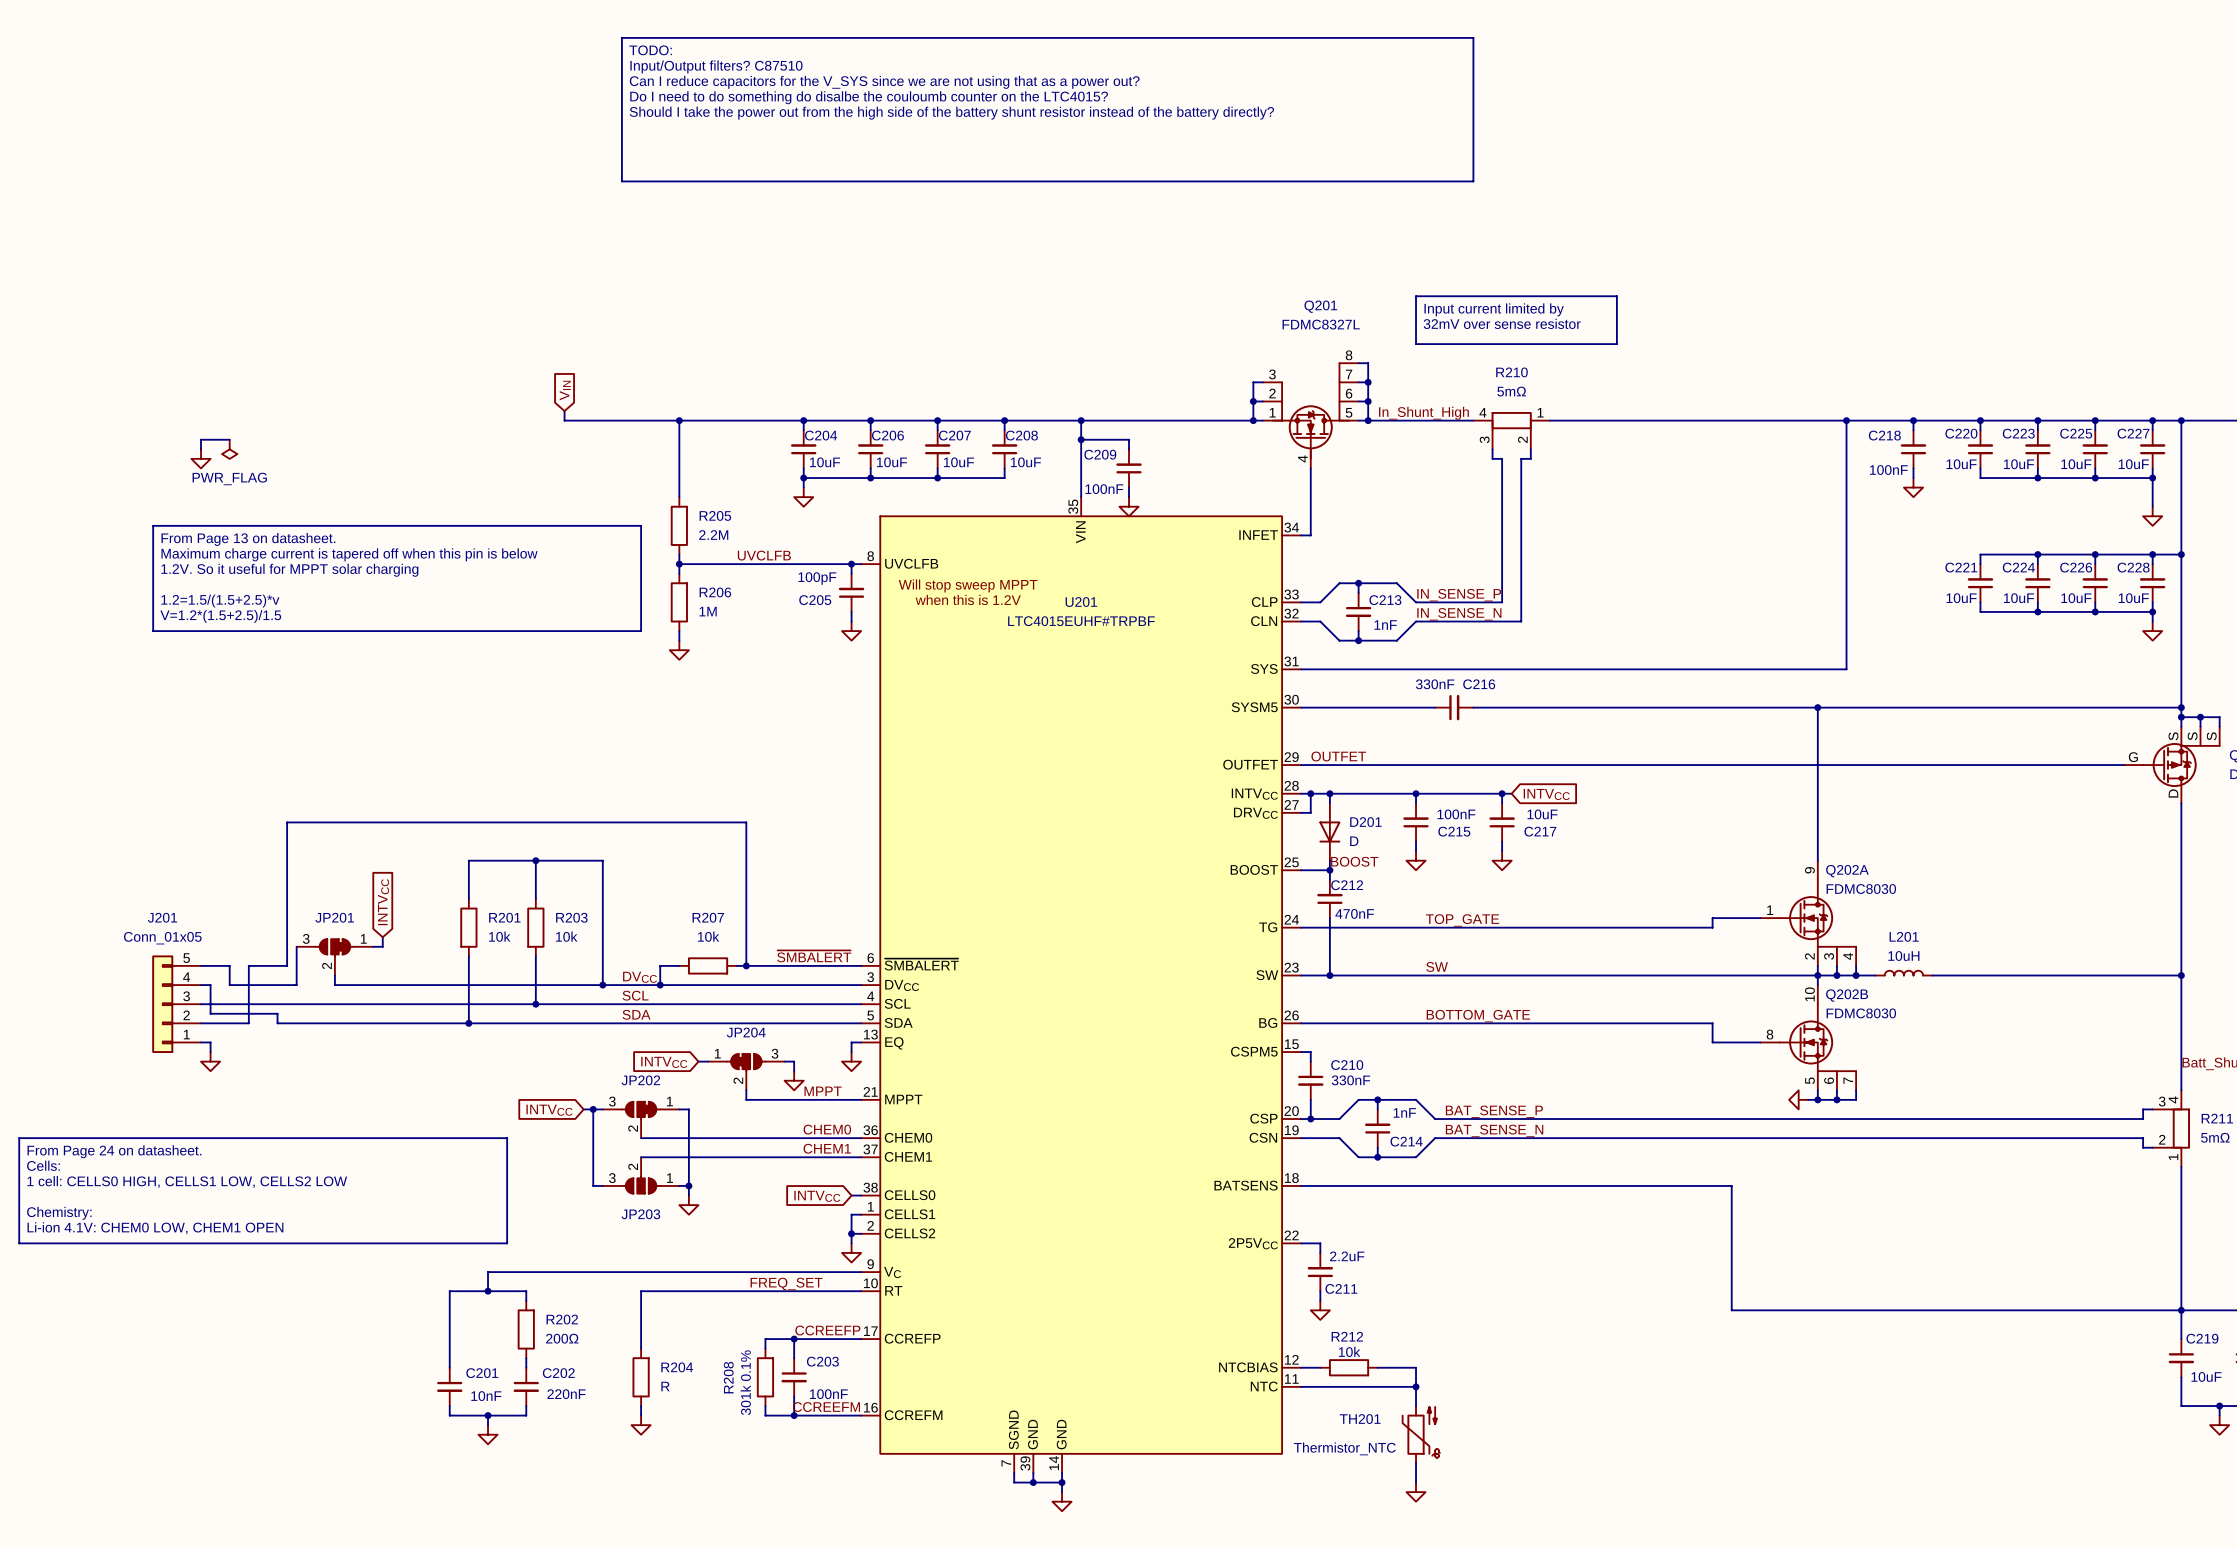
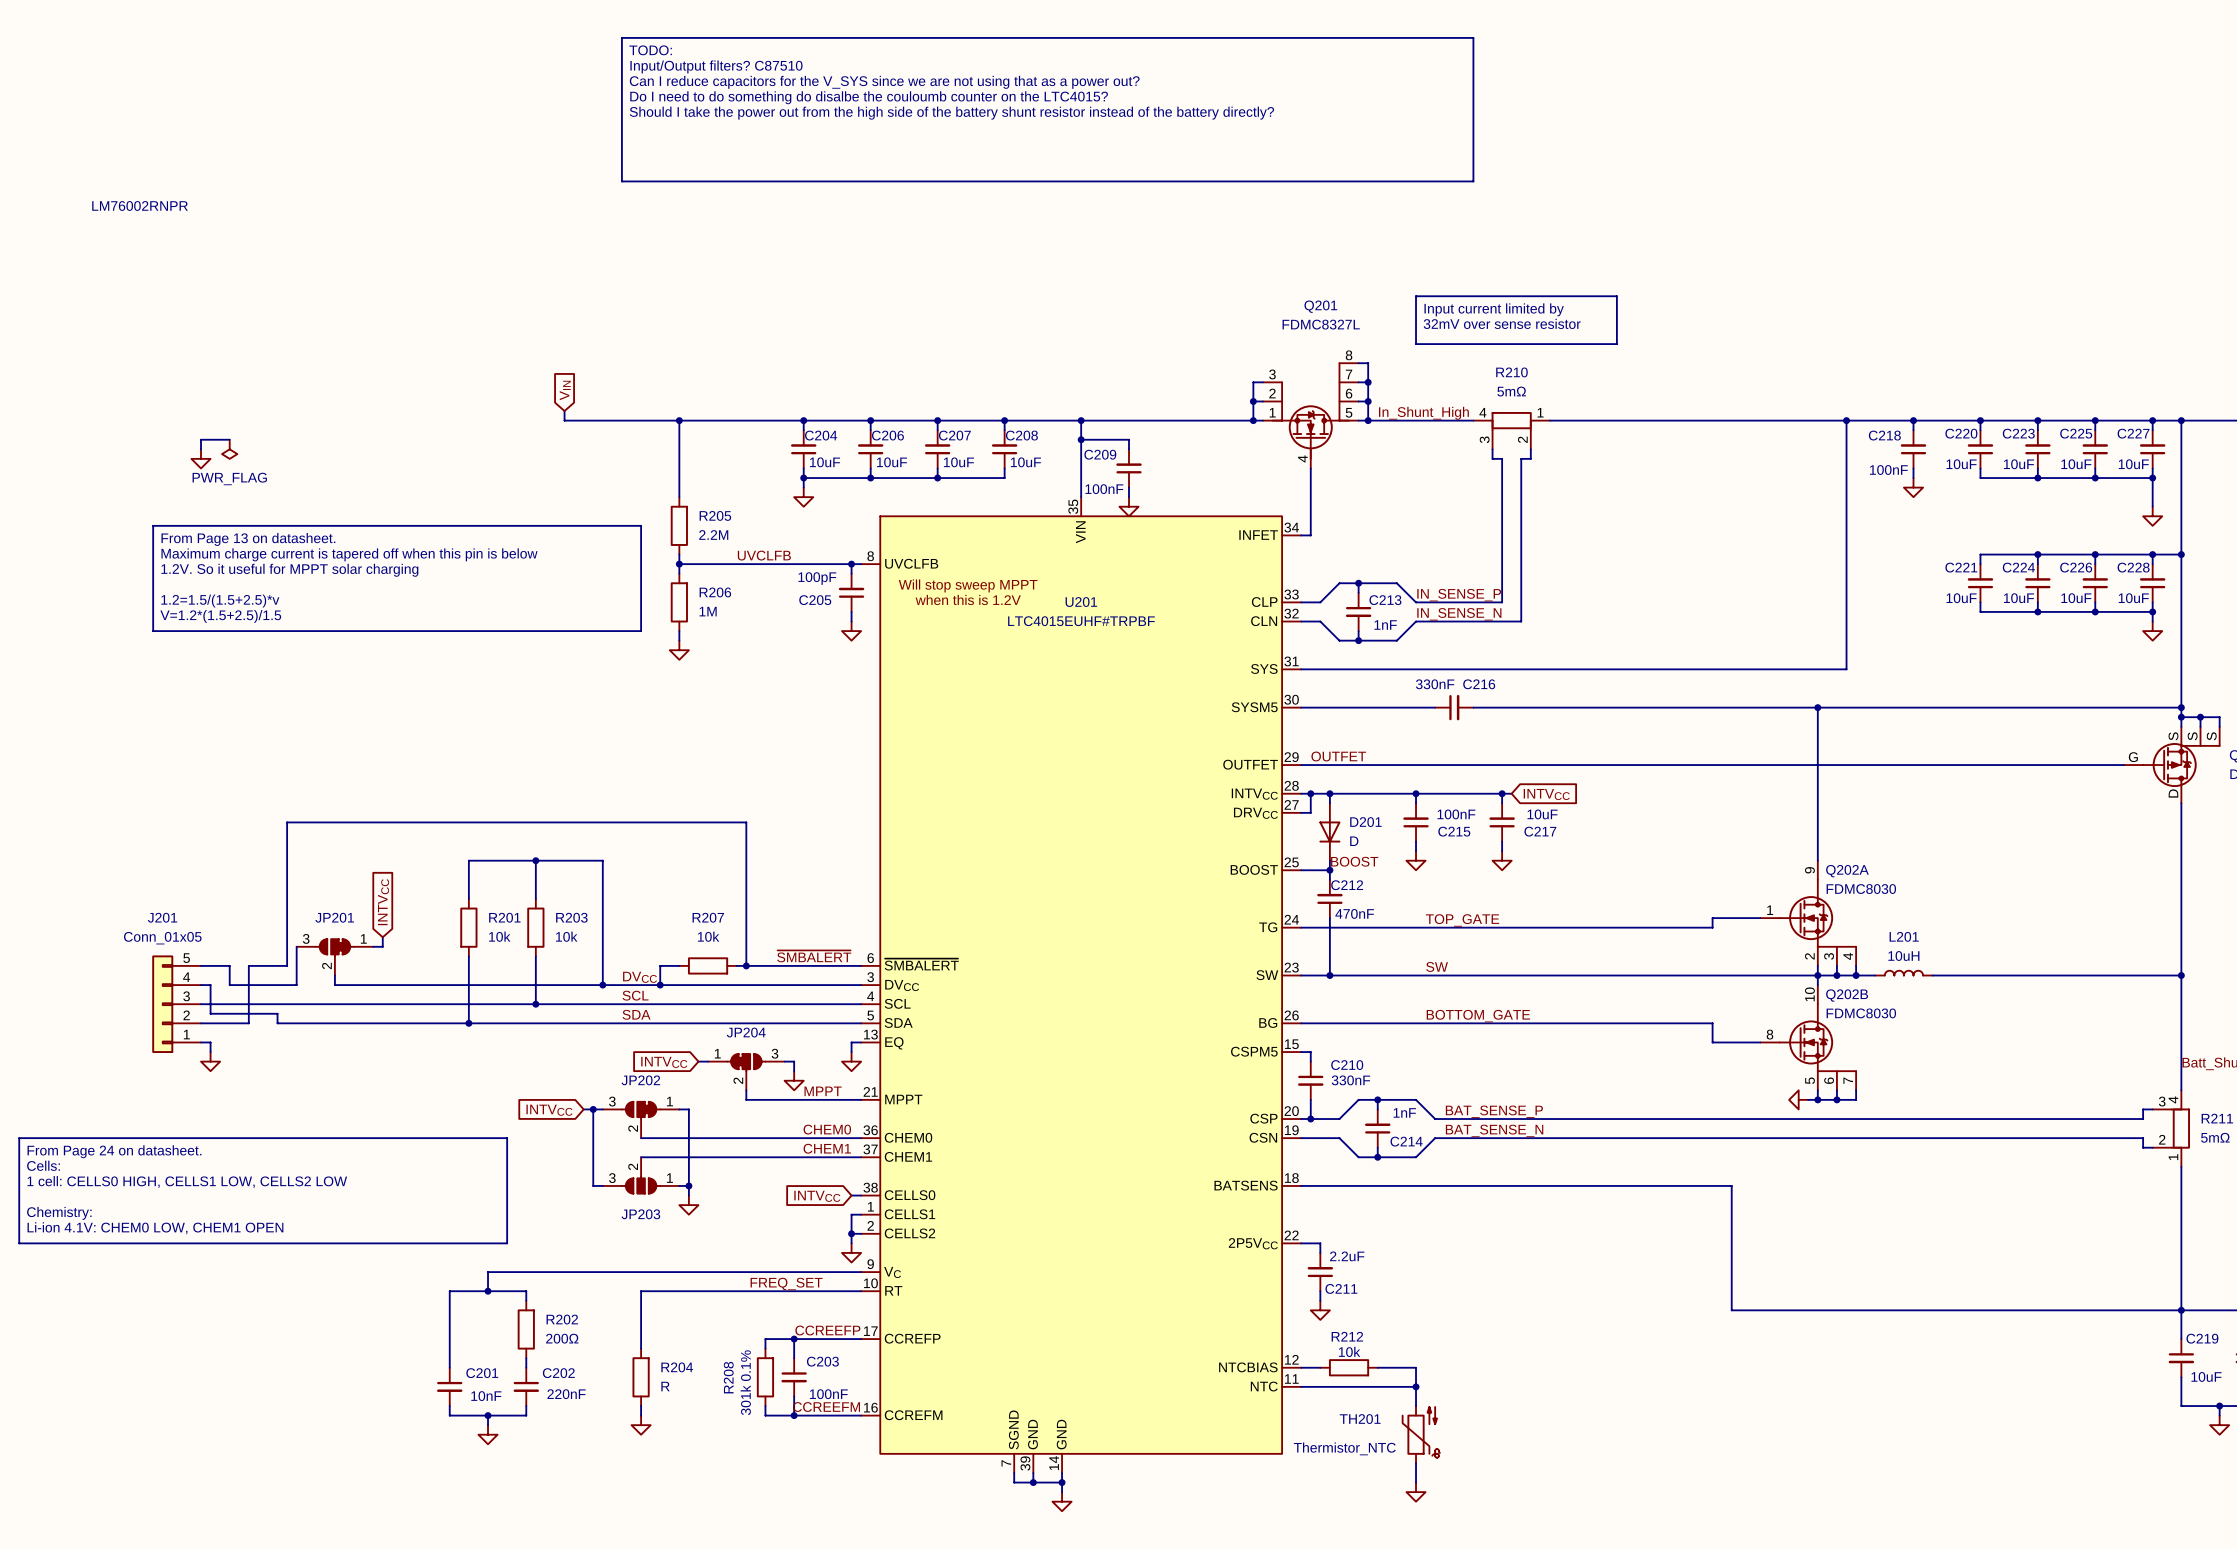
text: none -> LM76002RNPR (140, 205)

